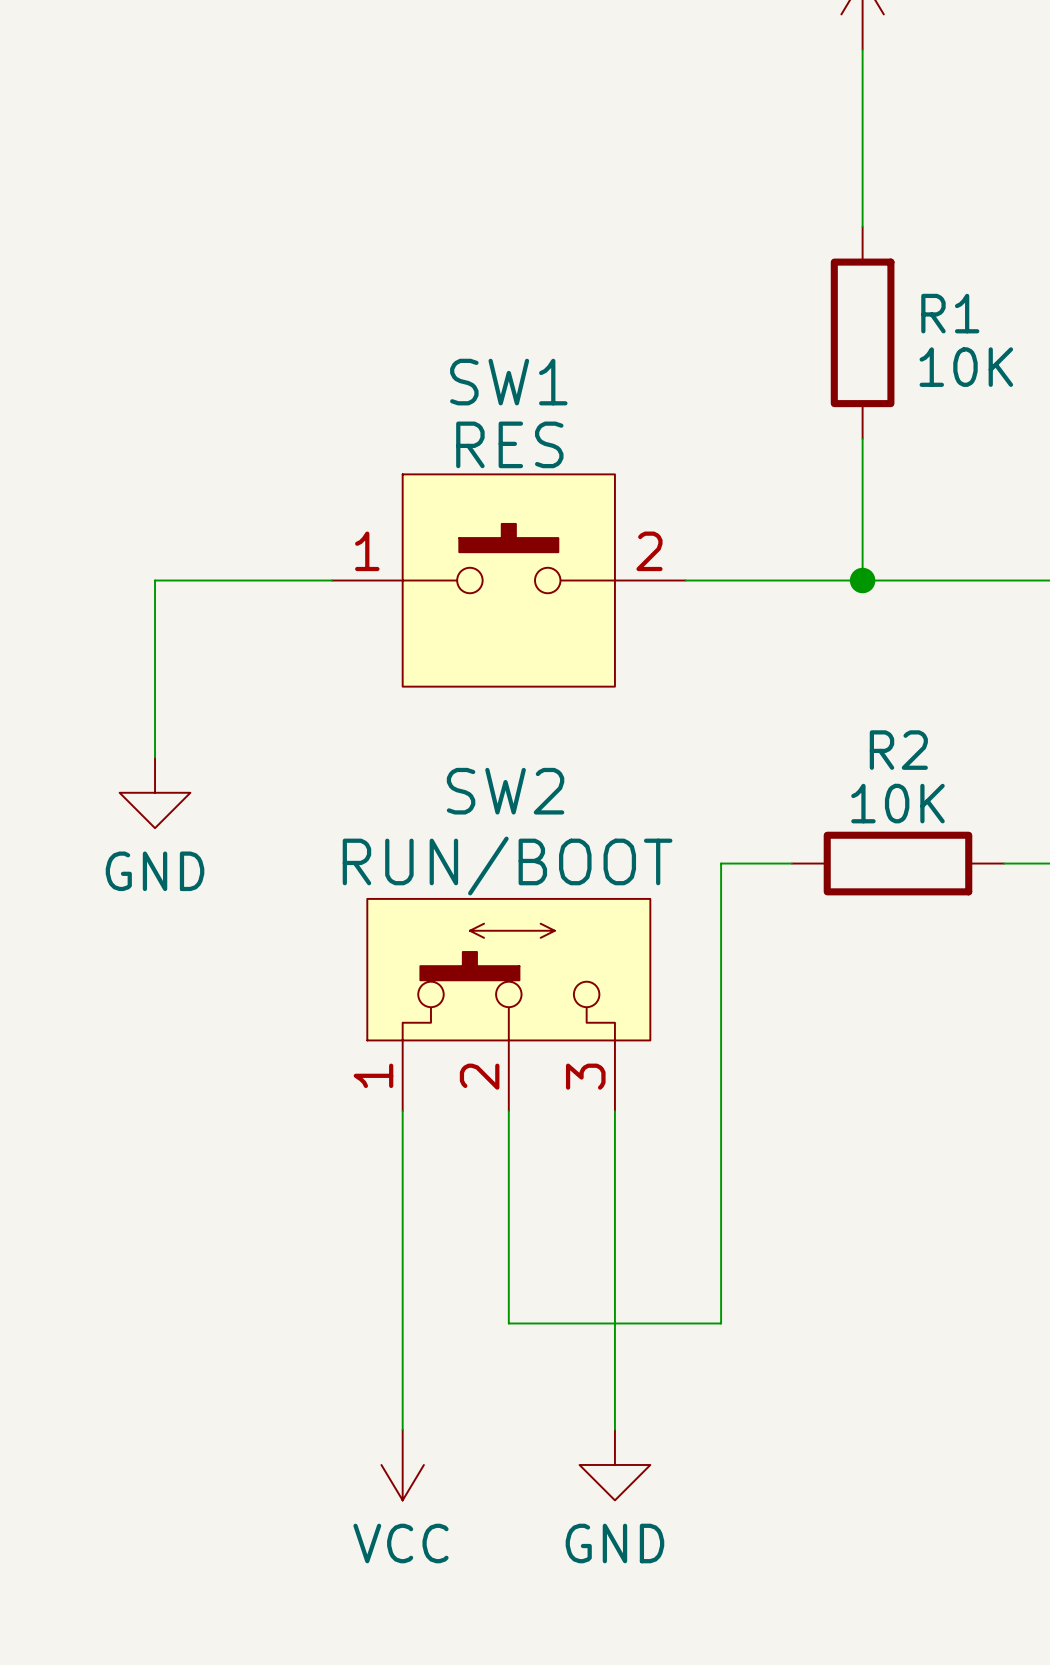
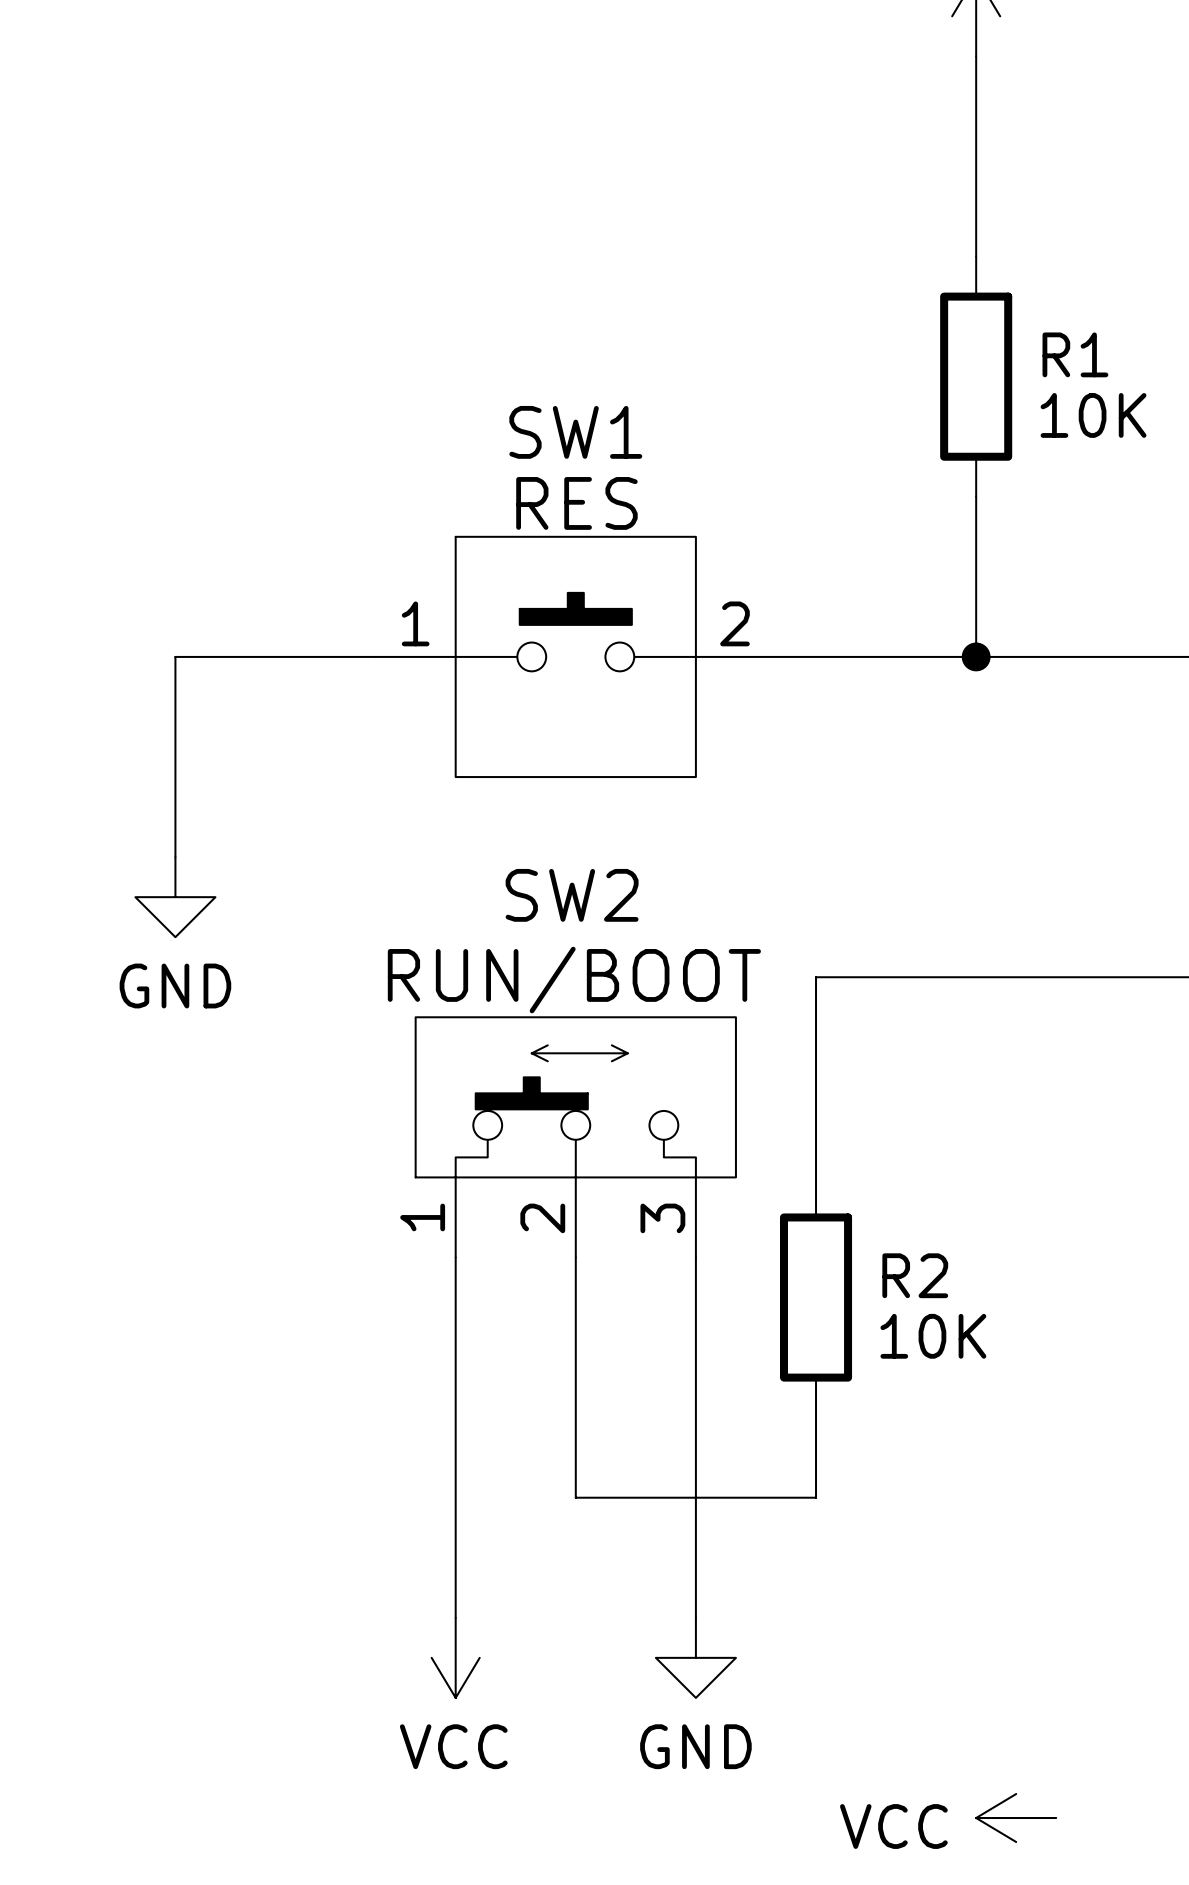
R2 value position: 10K (897, 803) -> 10K (933, 1336)
wire: none -> (896, 977) (1136, 977)
R2 rotation: 0° (897, 863) -> 90° clockwise (816, 1297)
R2 position: (897, 863) -> (816, 1297)
wire: (721, 1040) (721, 1252) -> none
power symbol: none -> VCC (1016, 1818)

